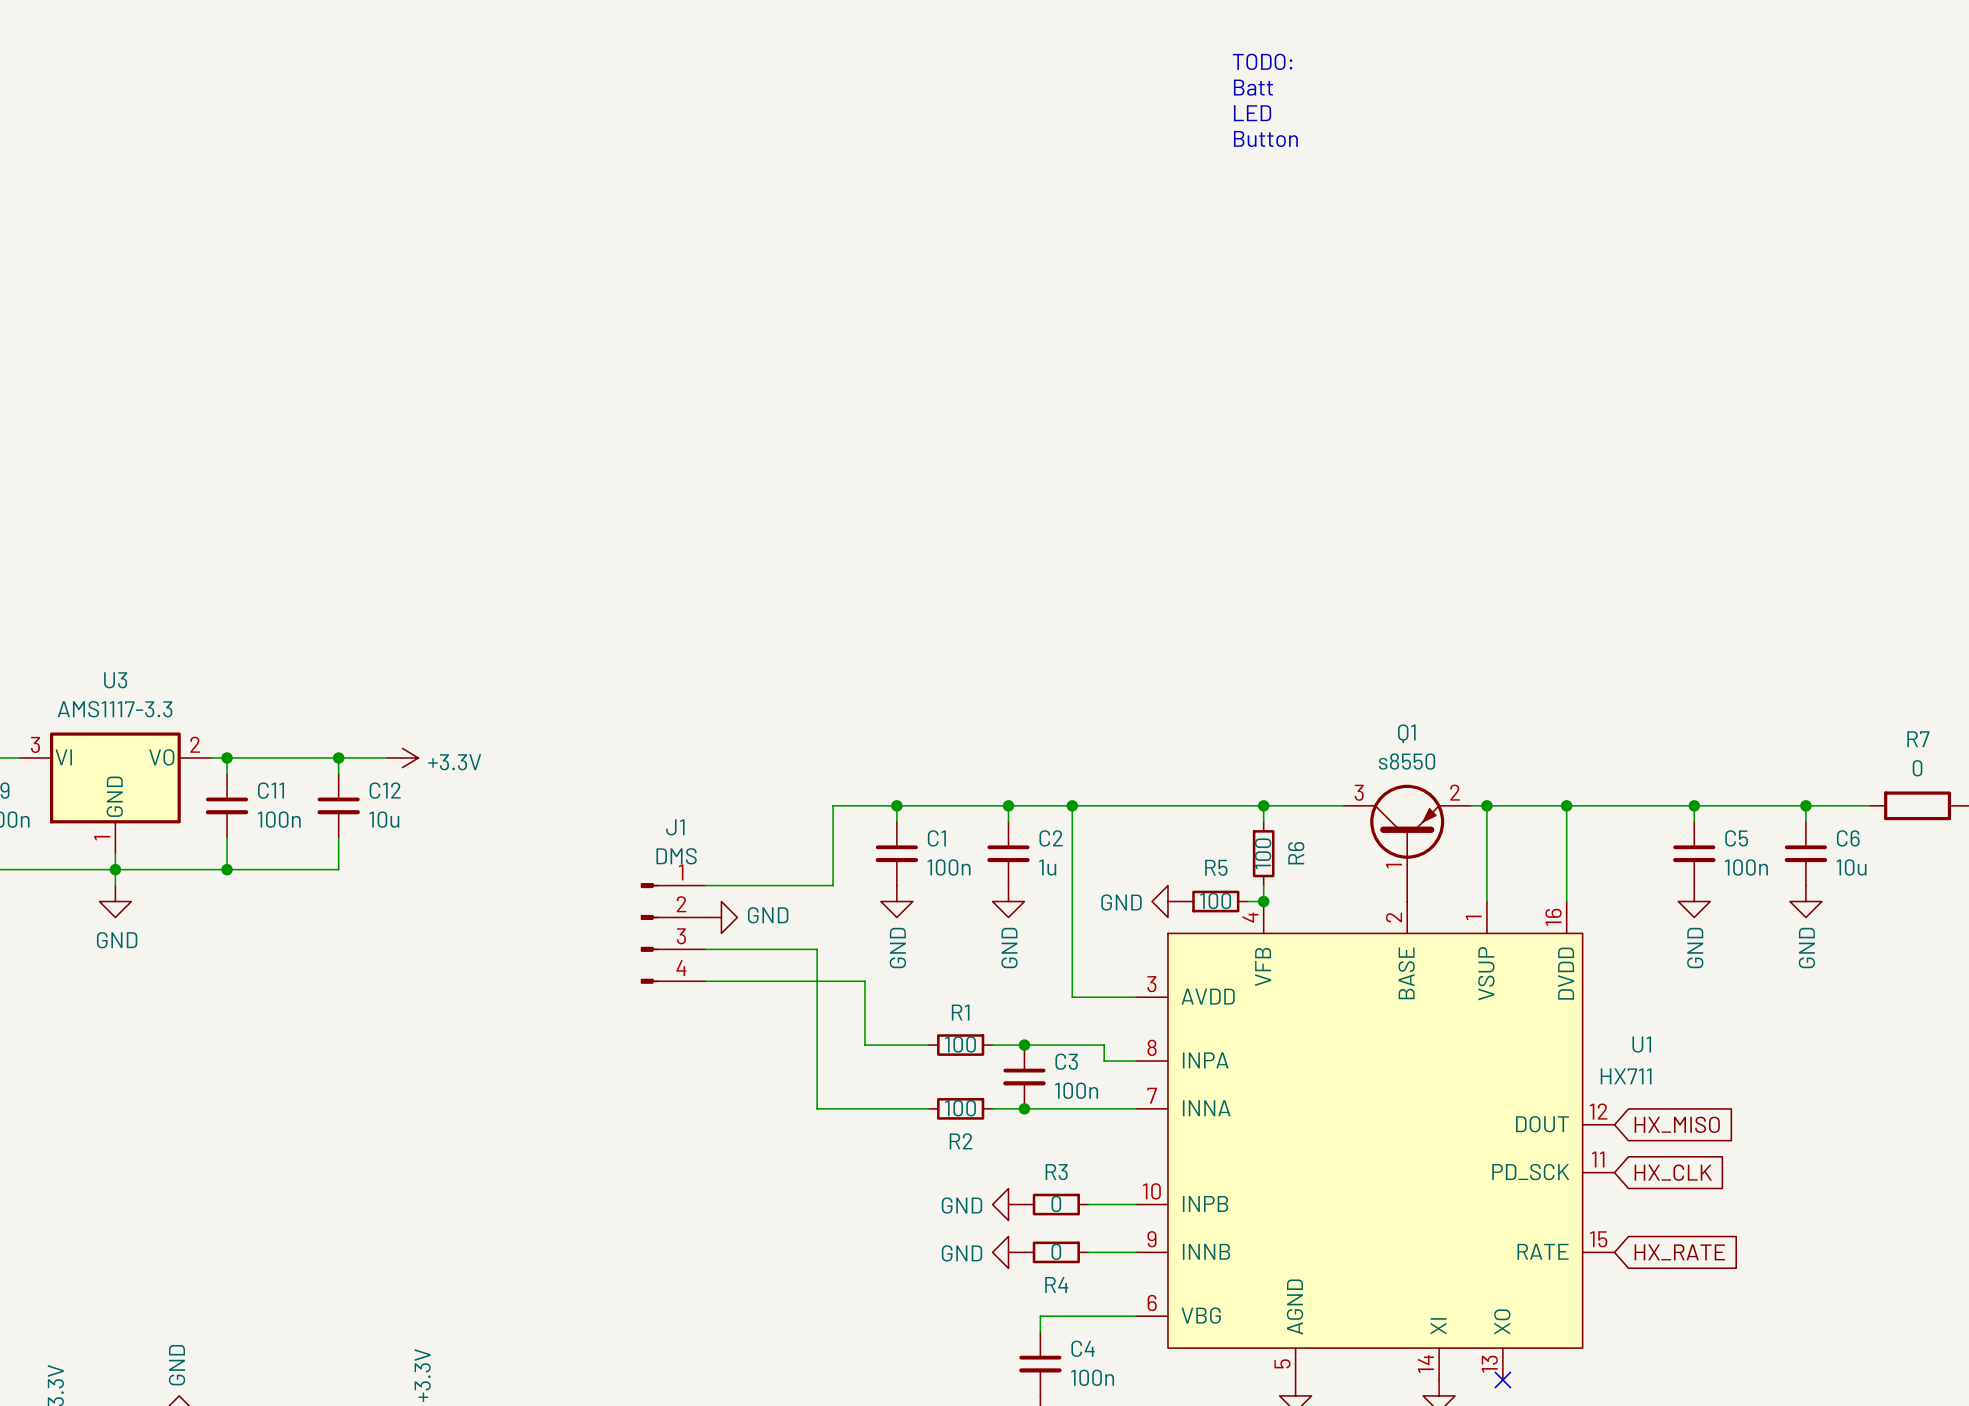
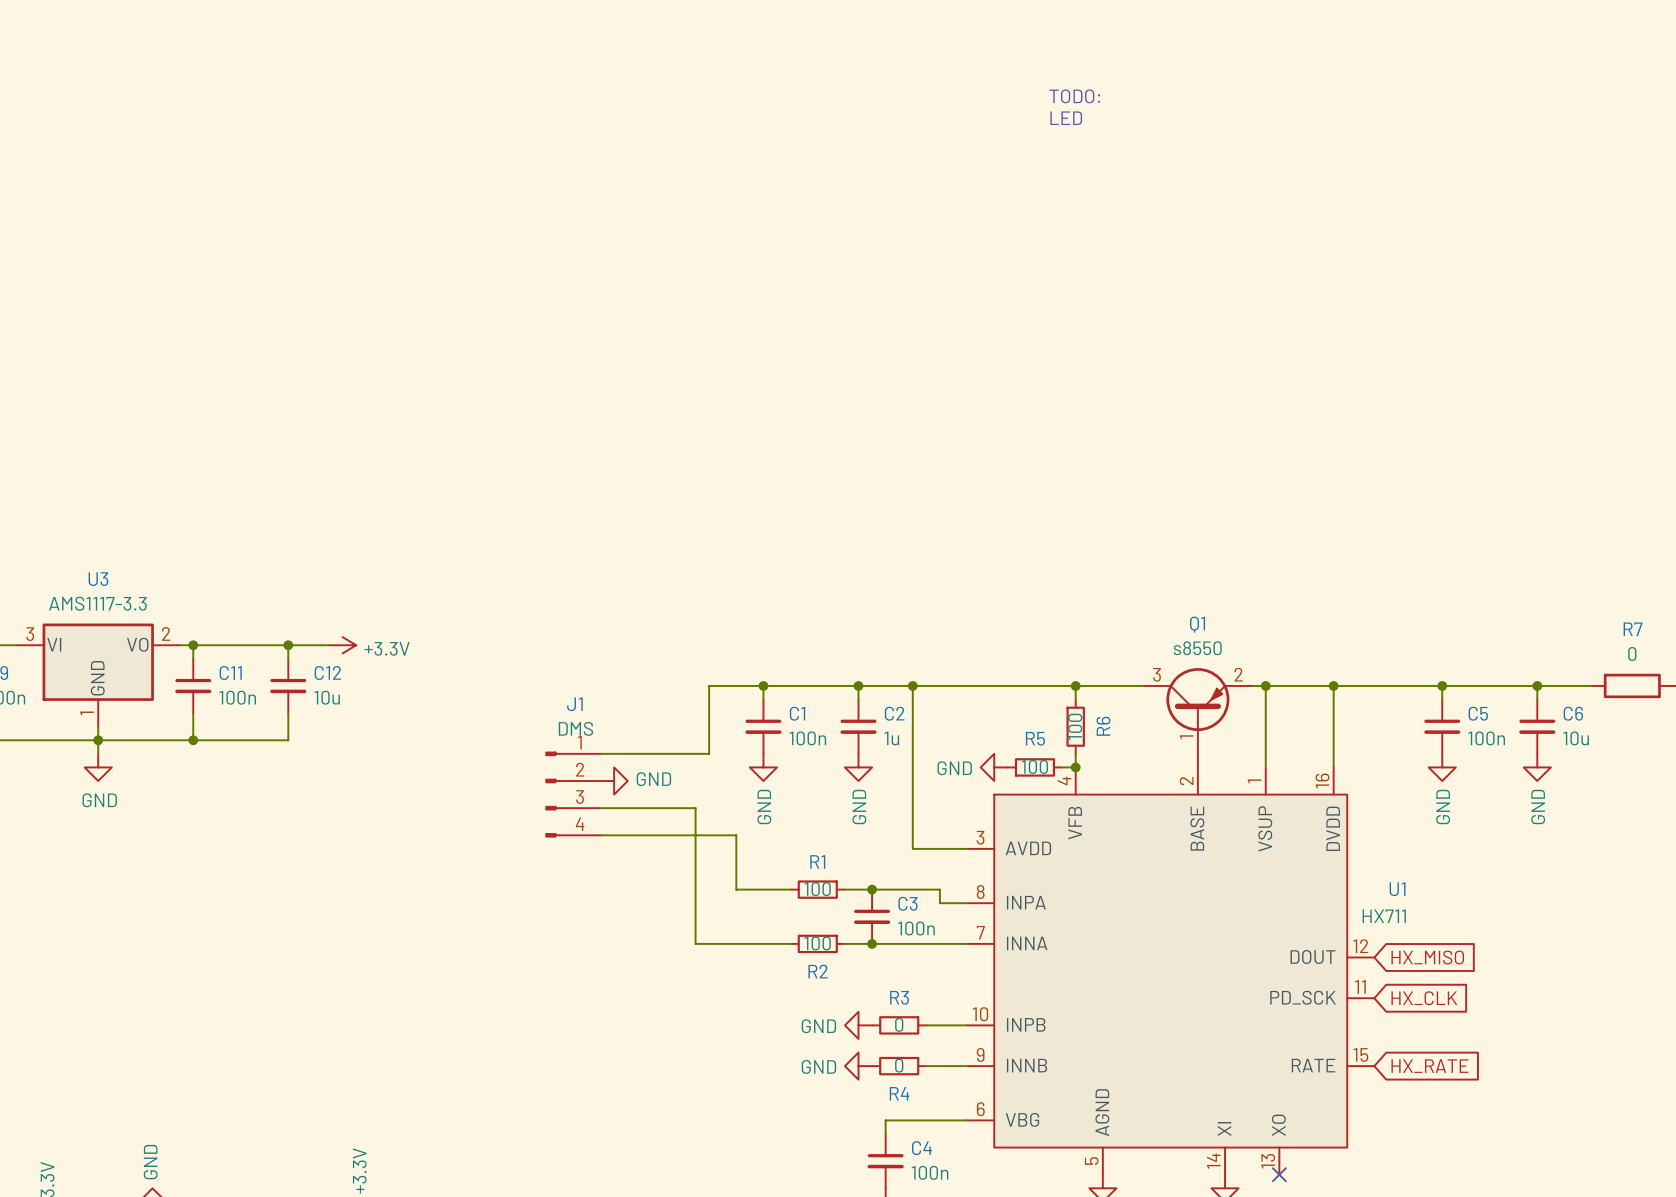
text: TODO: (1262, 61) -> none
text: Batt (1253, 87) -> none
text: LED (1252, 113) -> TODO: (1074, 96)
text: Button (1265, 138) -> LED (1066, 118)

